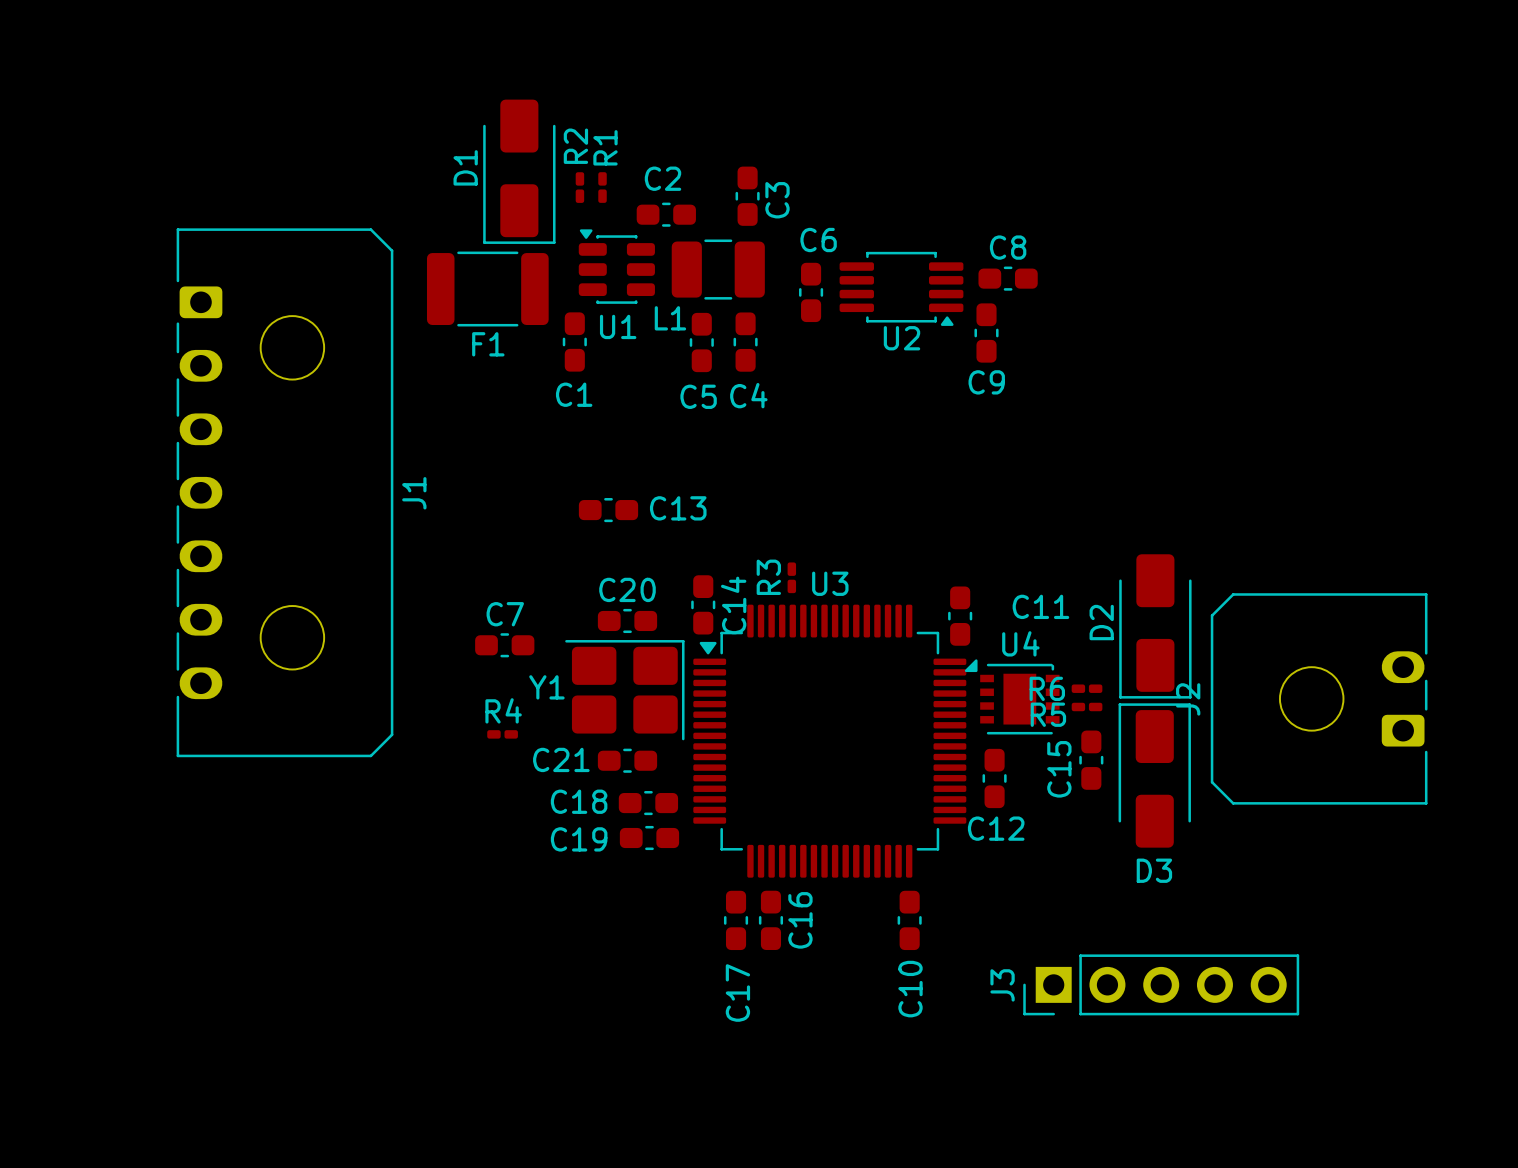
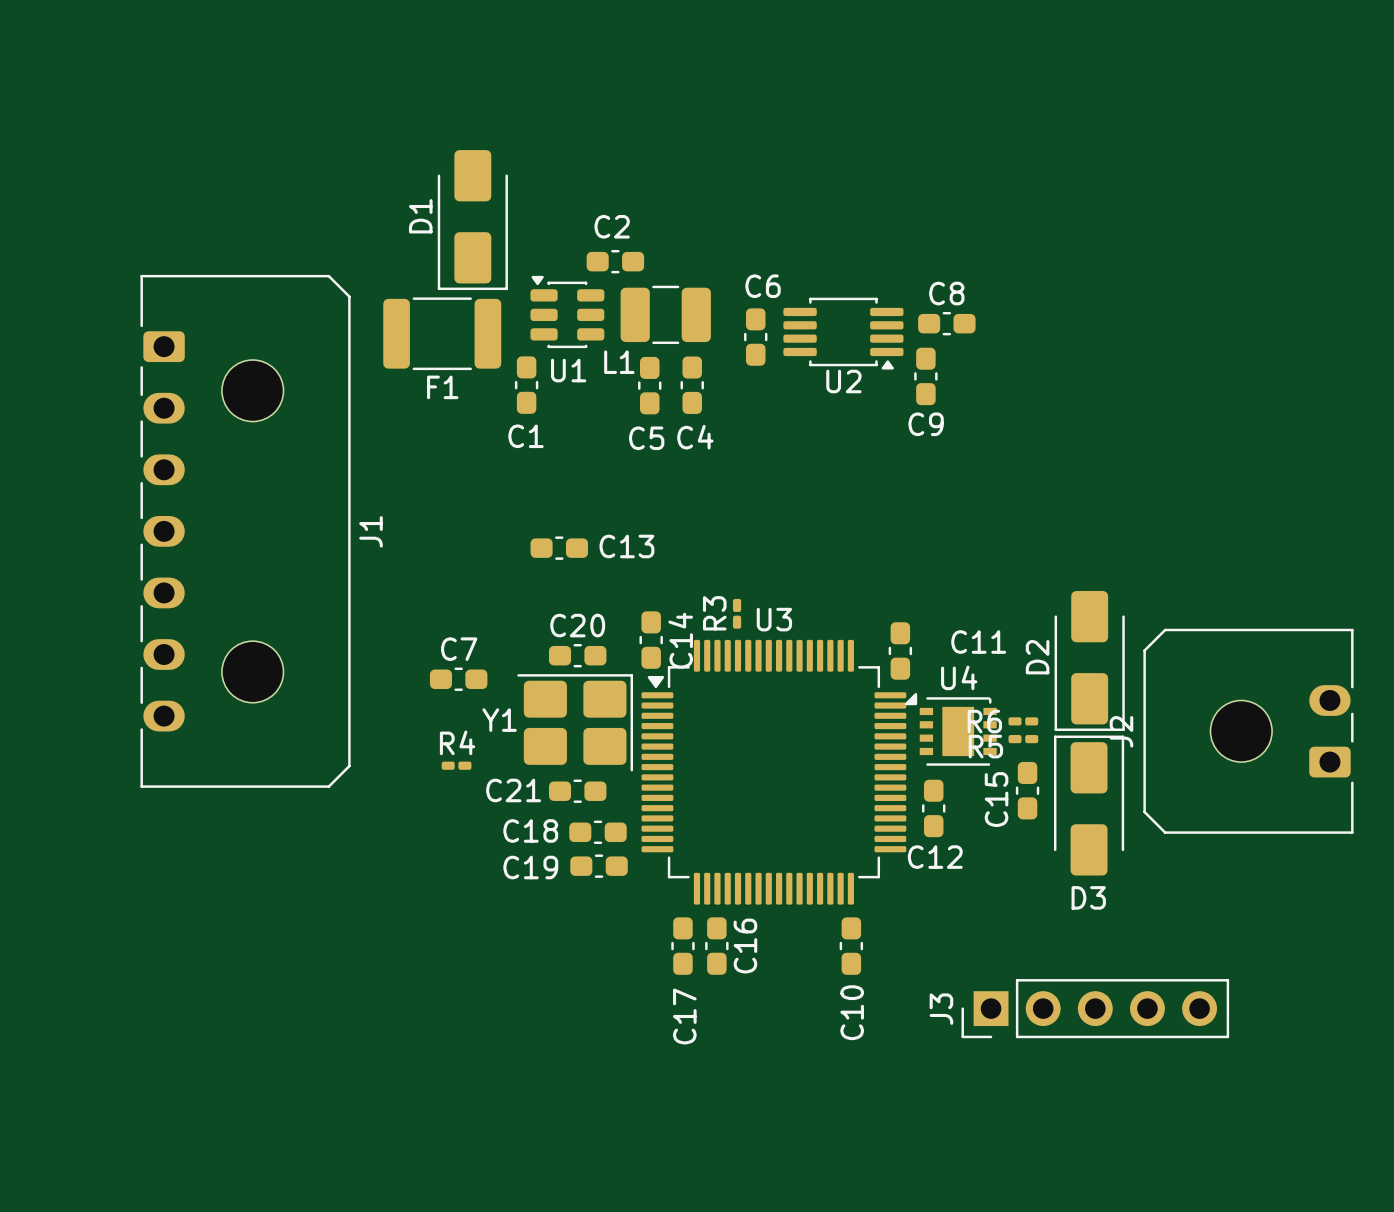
R2: (579, 187) -> none
R1: (602, 187) -> none
C3: (747, 196) -> none

